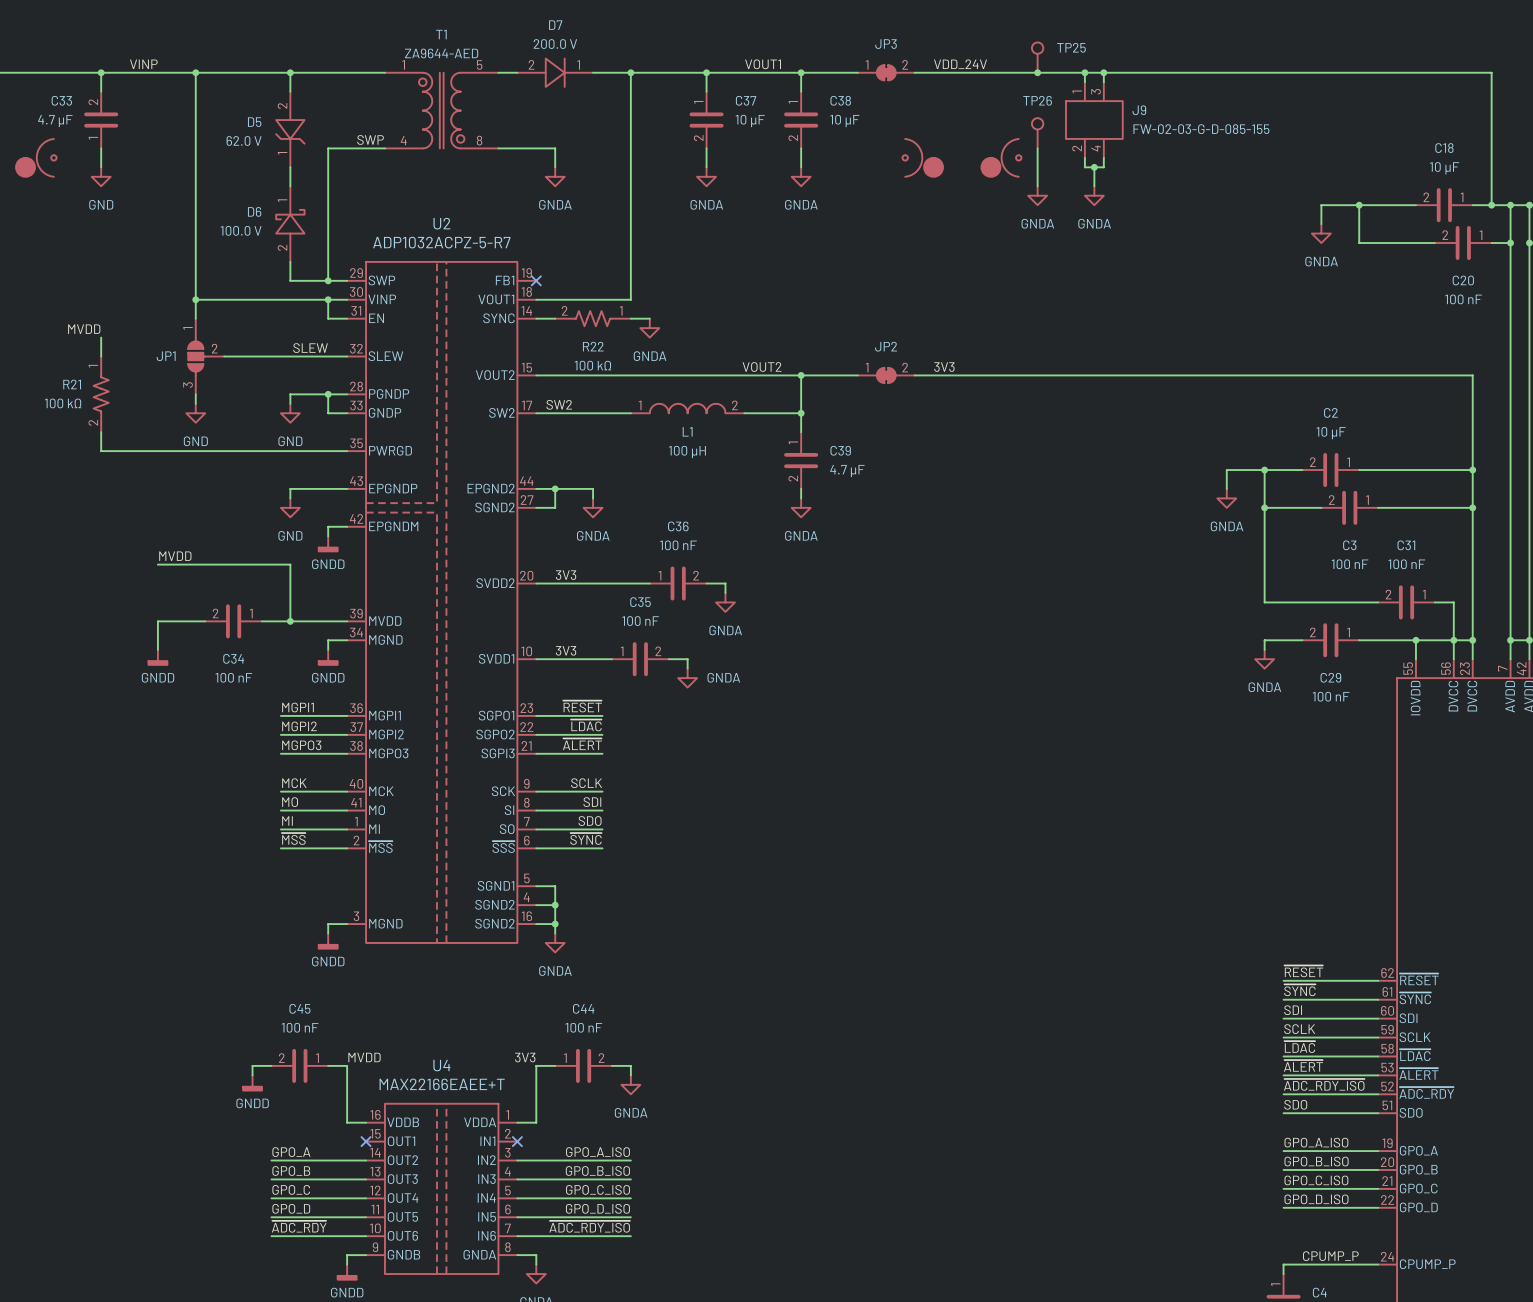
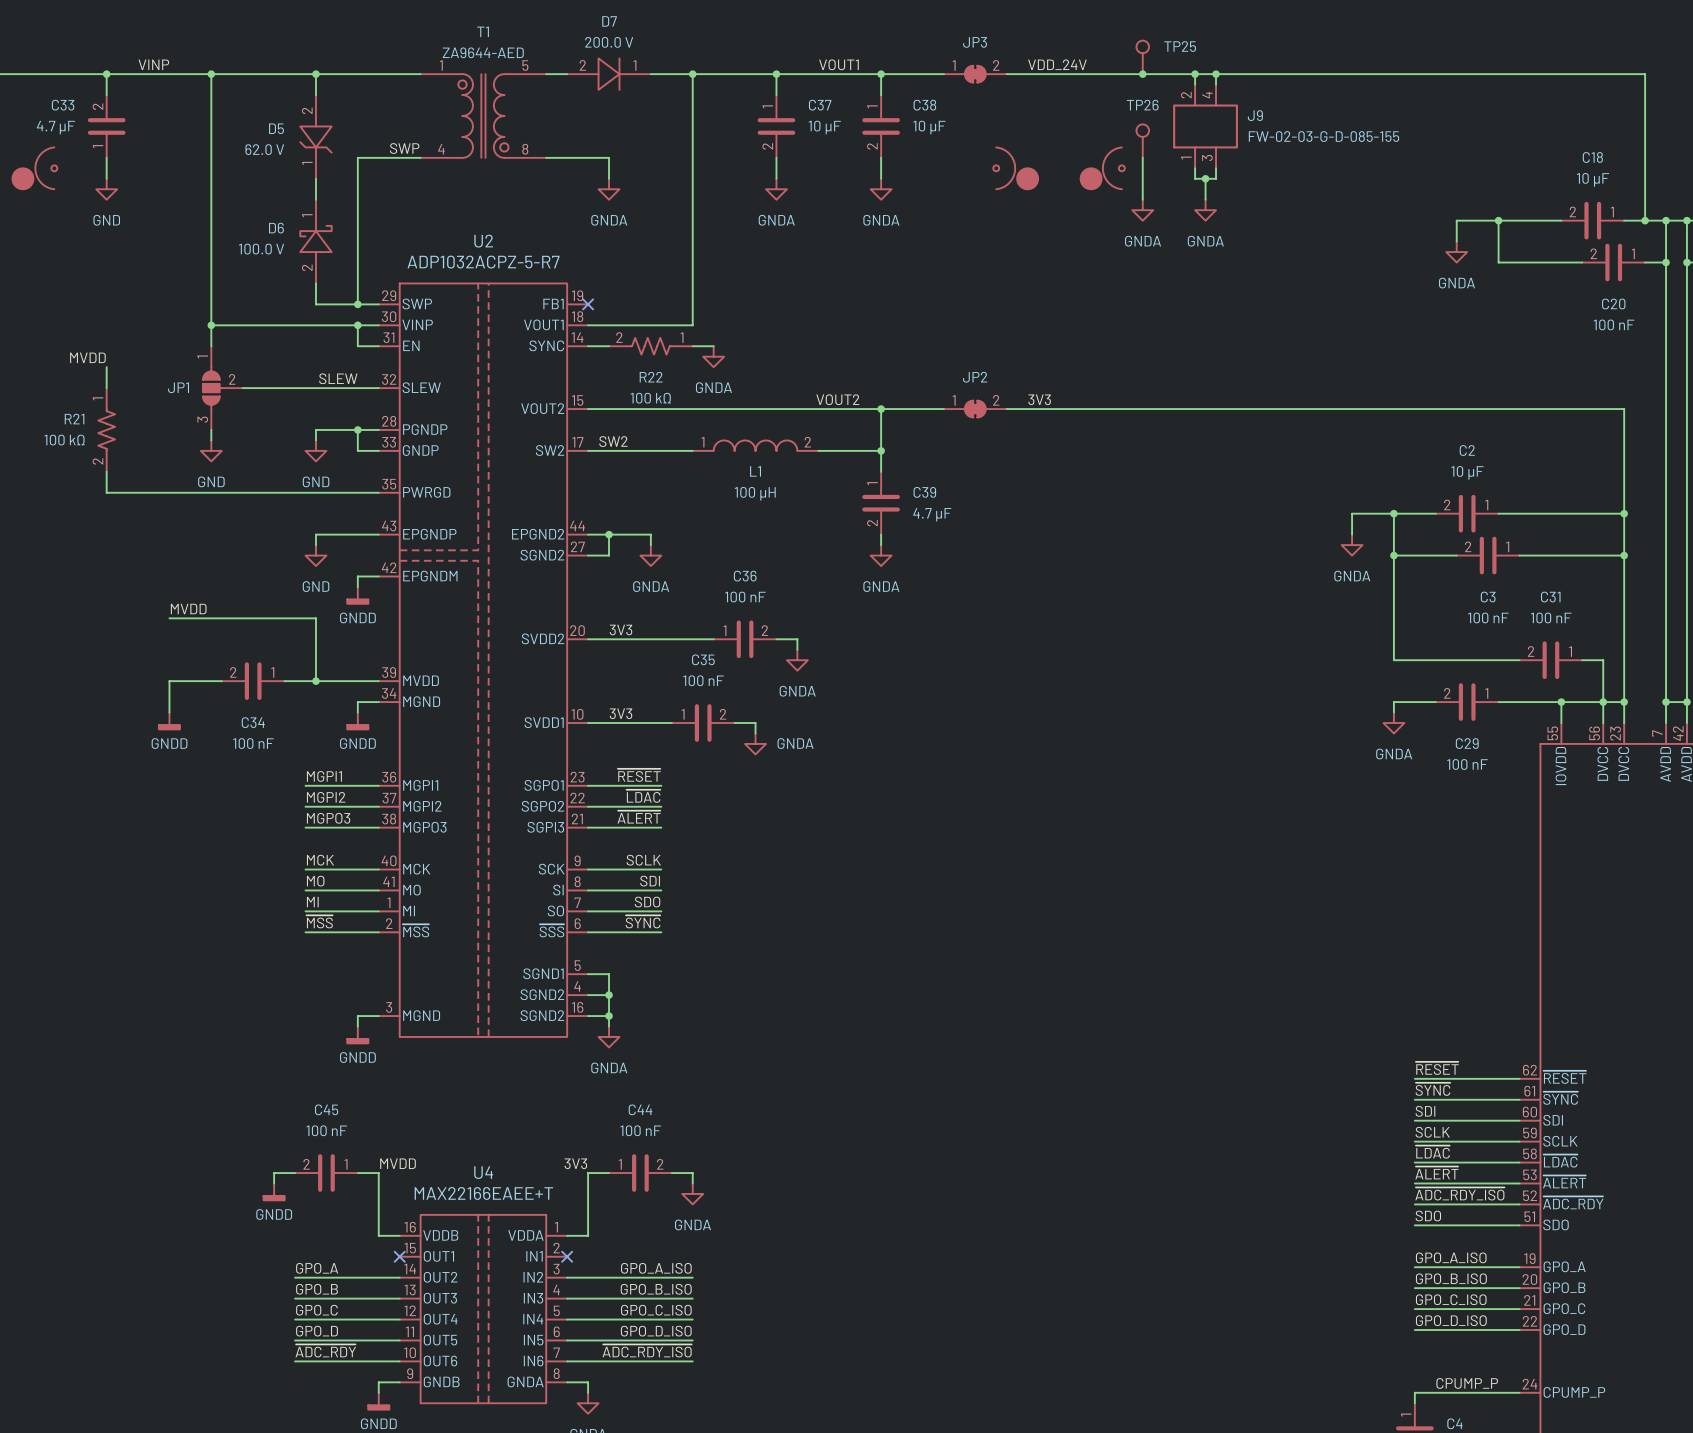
J9 flip: as is (1094, 120) -> up-down (1205, 126)

